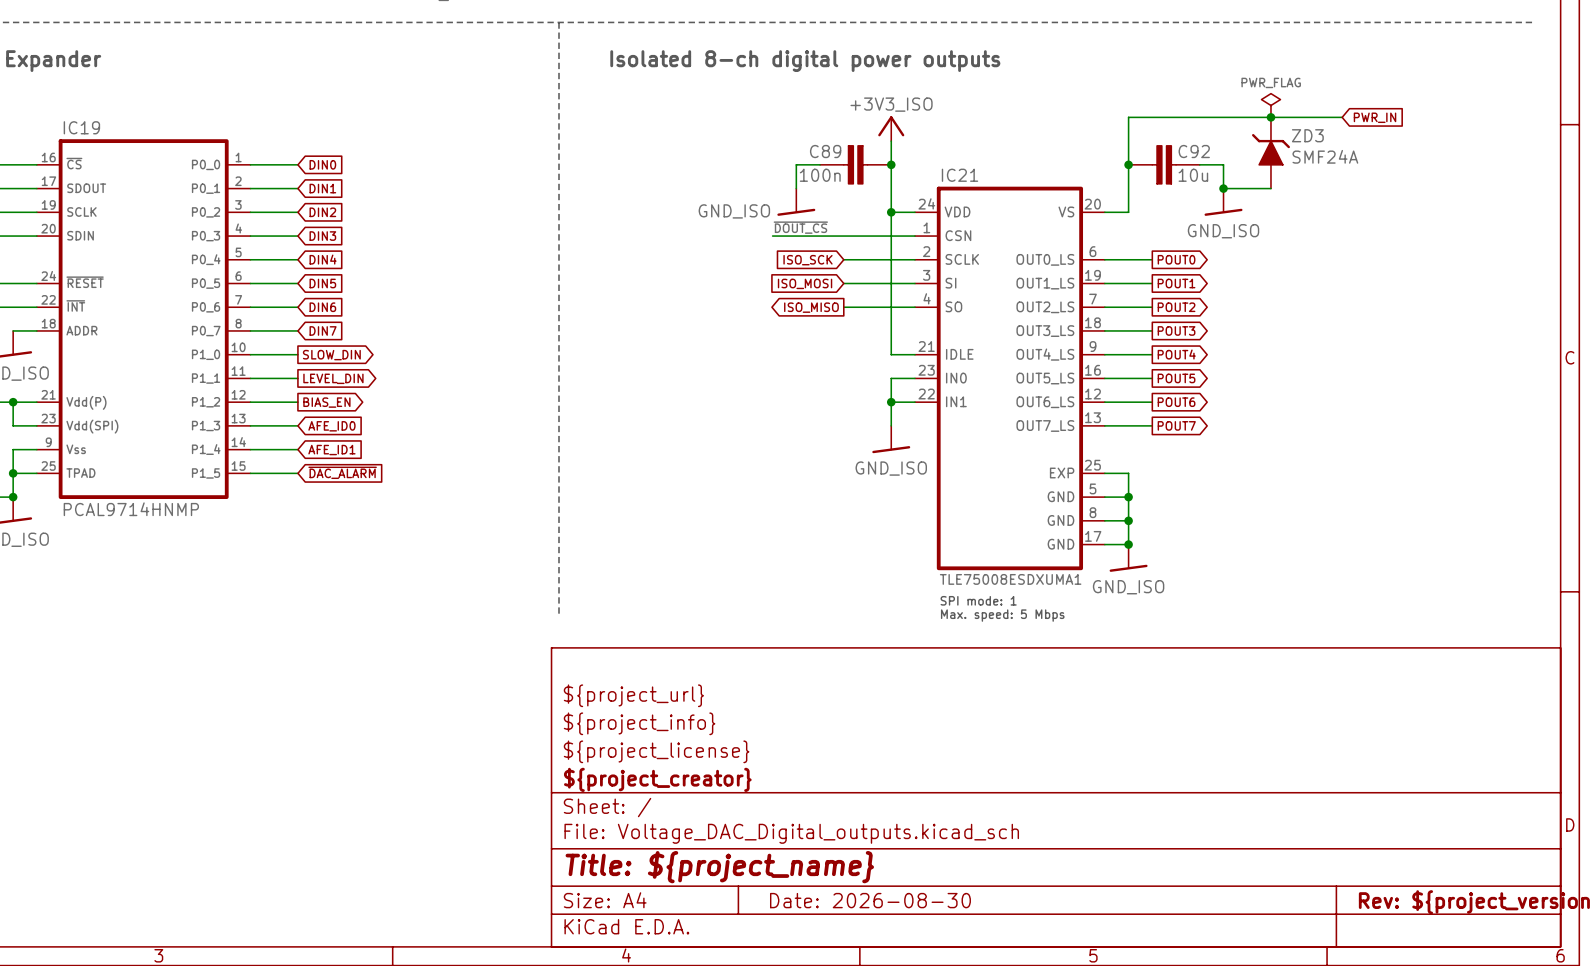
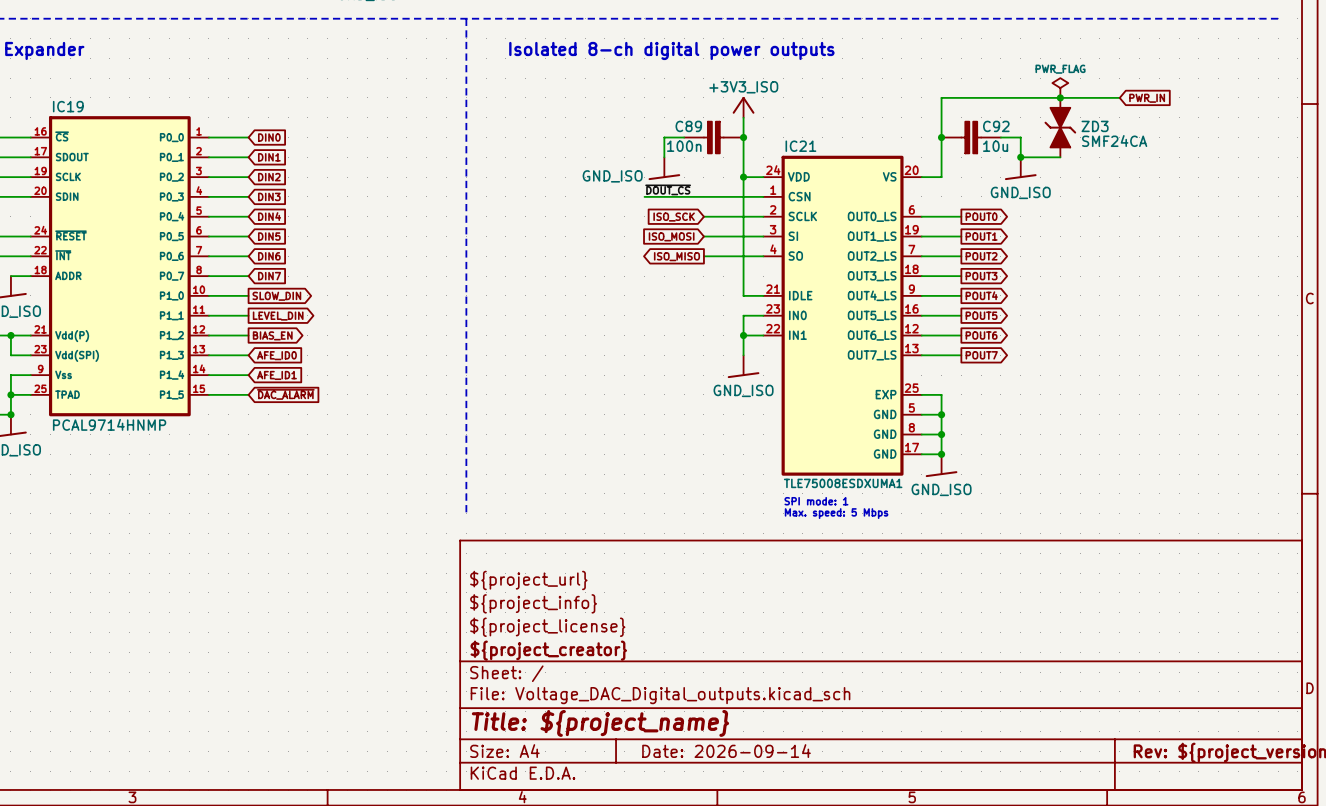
ZD3 symbol: [1251, 117, 1290, 189] -> [1044, 97, 1077, 158]
ZD3 value: SMF24A (1325, 156) -> SMF24CA (1114, 141)
title block: Date: 2026-08-30 (870, 900) -> Date: 2026-09-14 (726, 751)

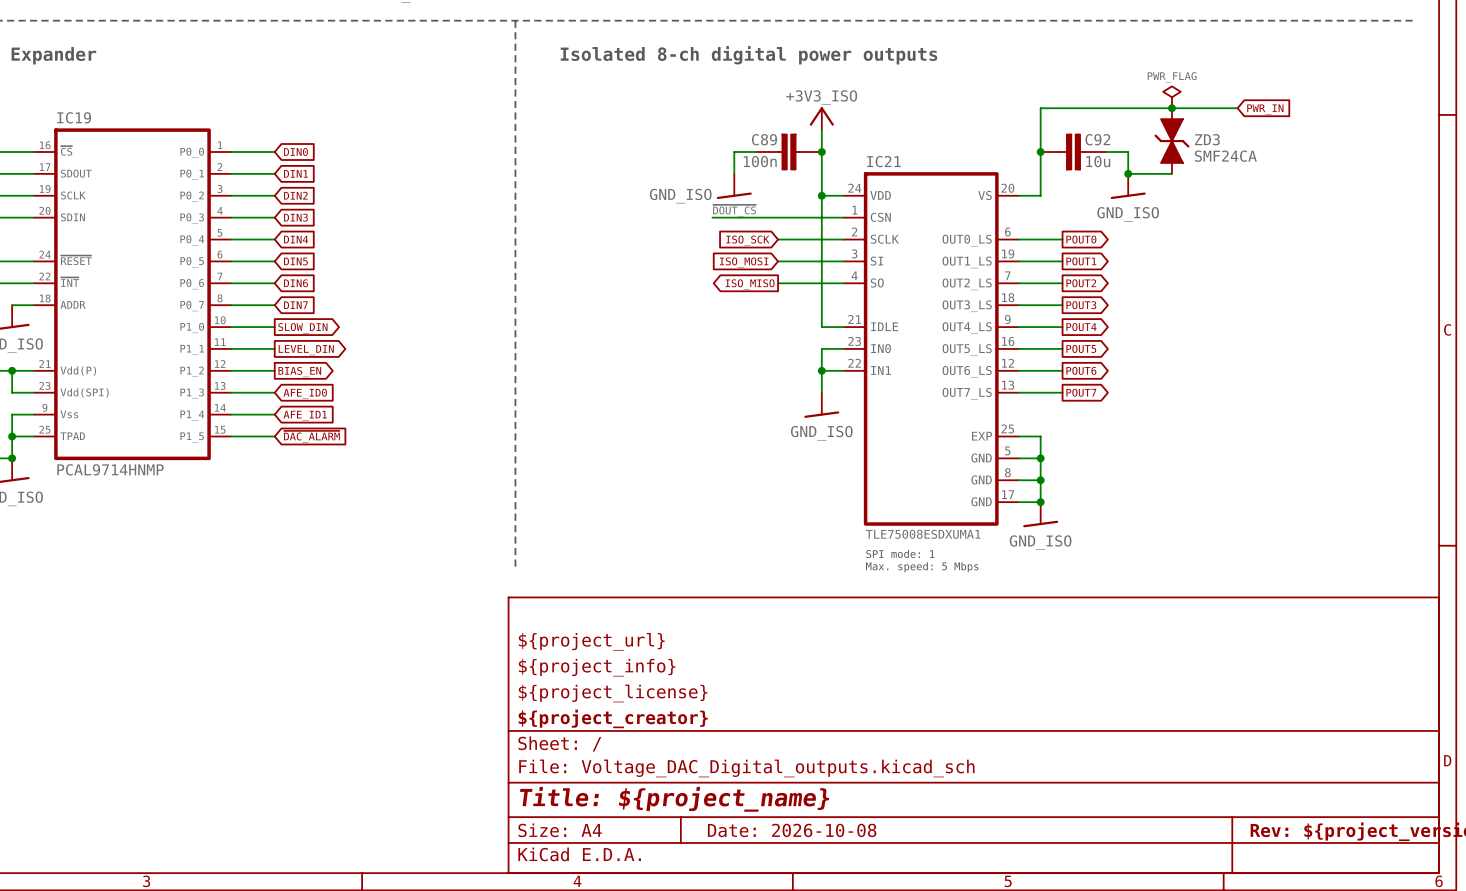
title block: Date: 2026-09-14 (726, 751) -> Date: 2026-10-08 (792, 830)

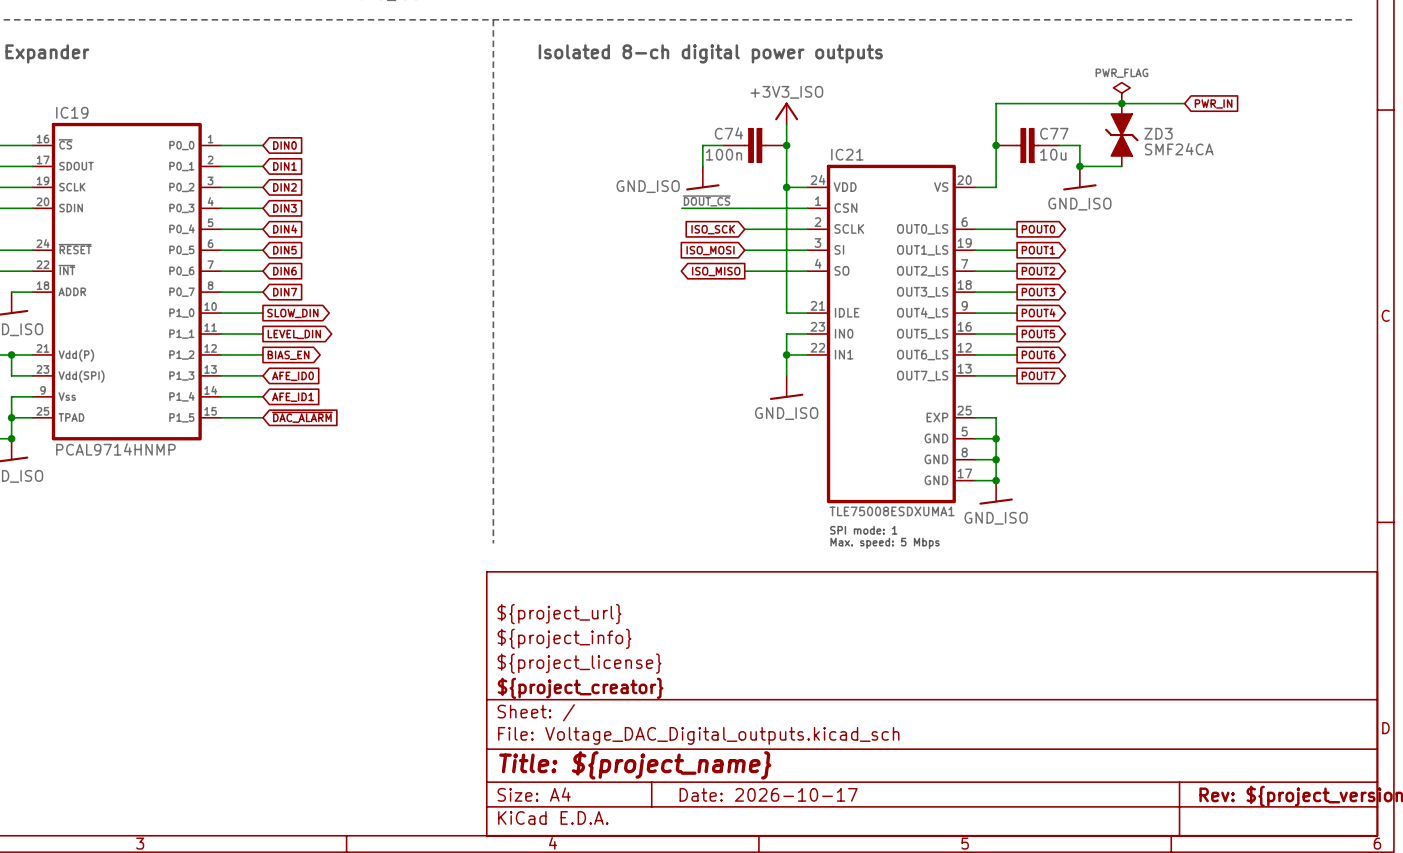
C89 name: C89 (764, 139) -> C74 (728, 133)
C92 name: C92 (1097, 139) -> C77 (1054, 133)
title block: Date: 2026-10-08 (792, 830) -> Date: 2026-10-17 (768, 794)

